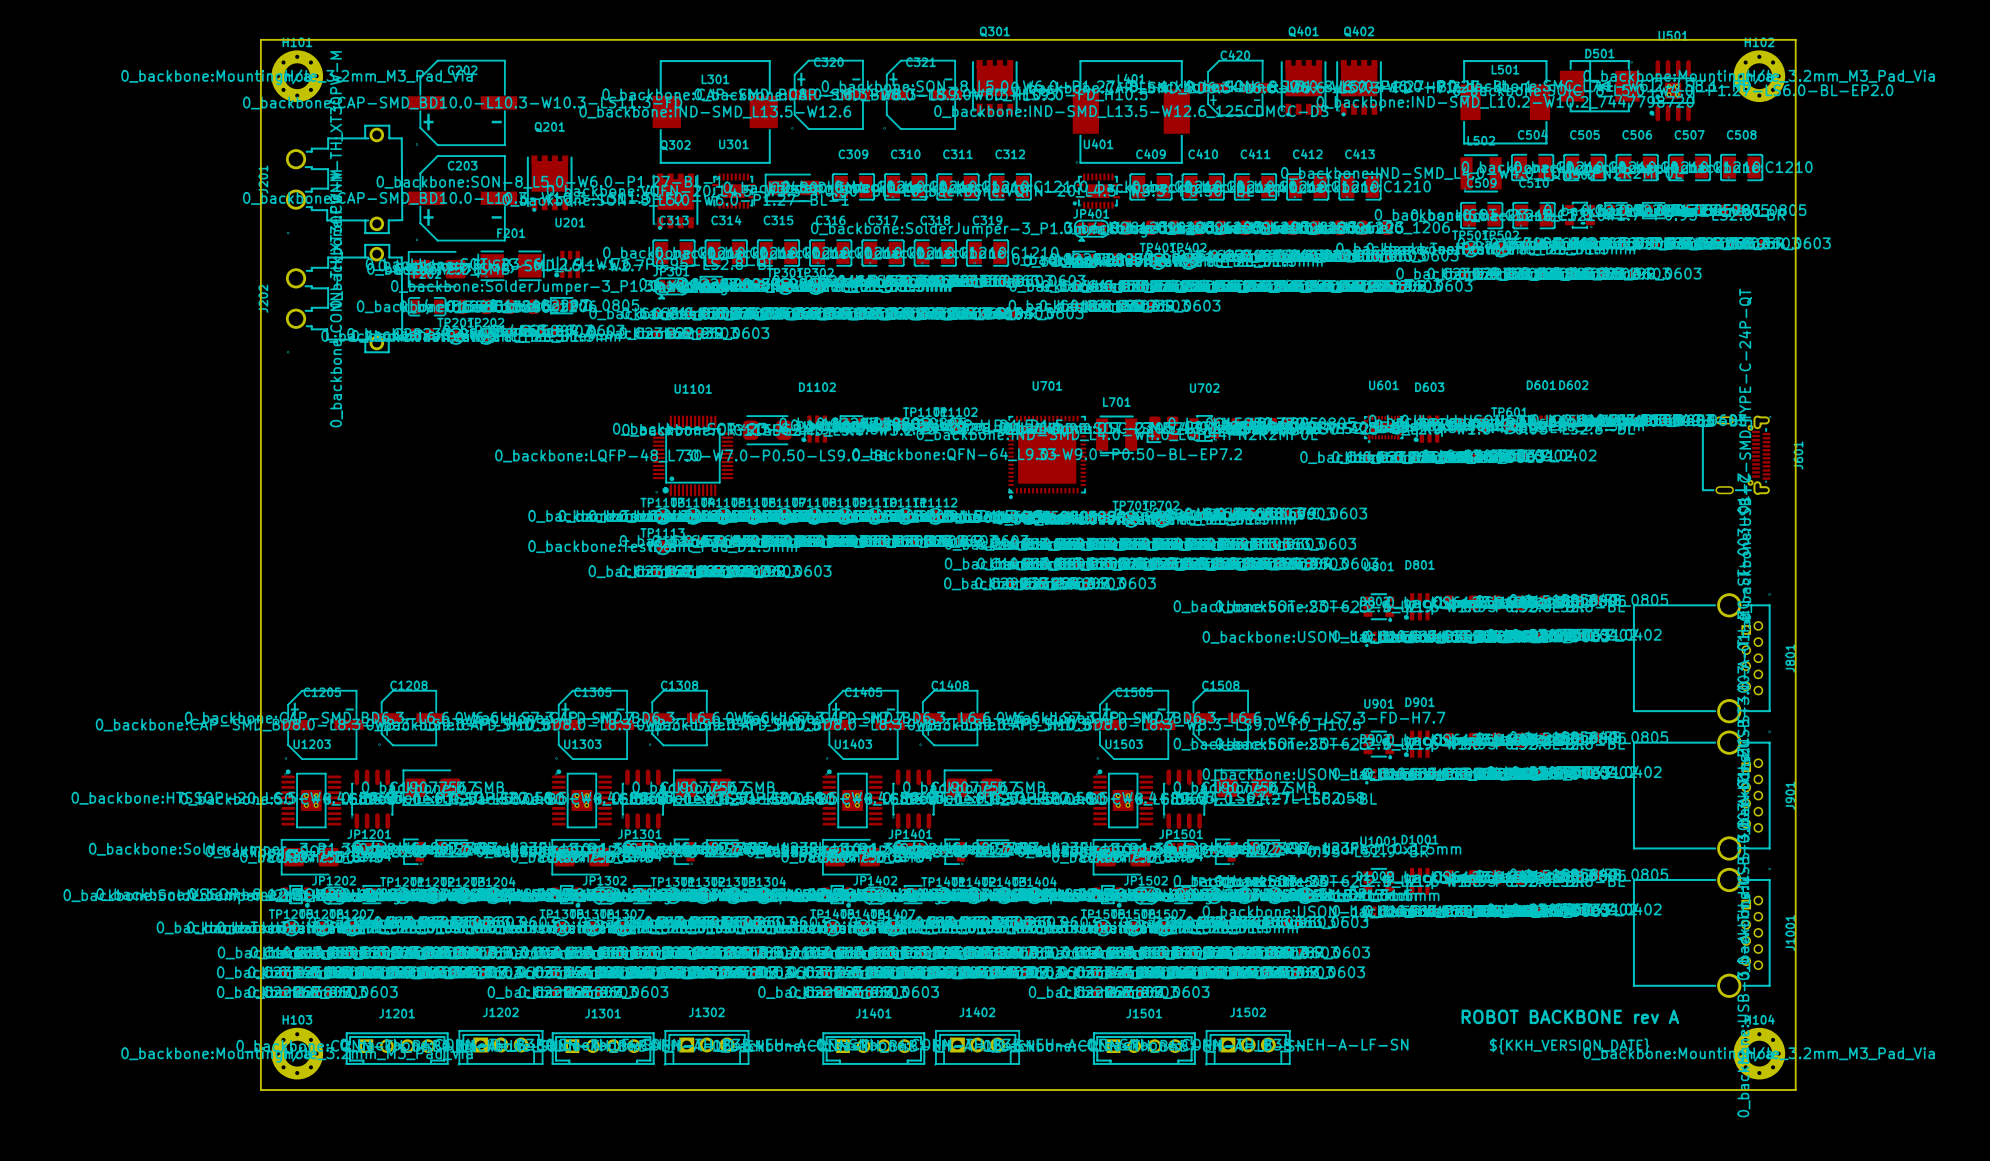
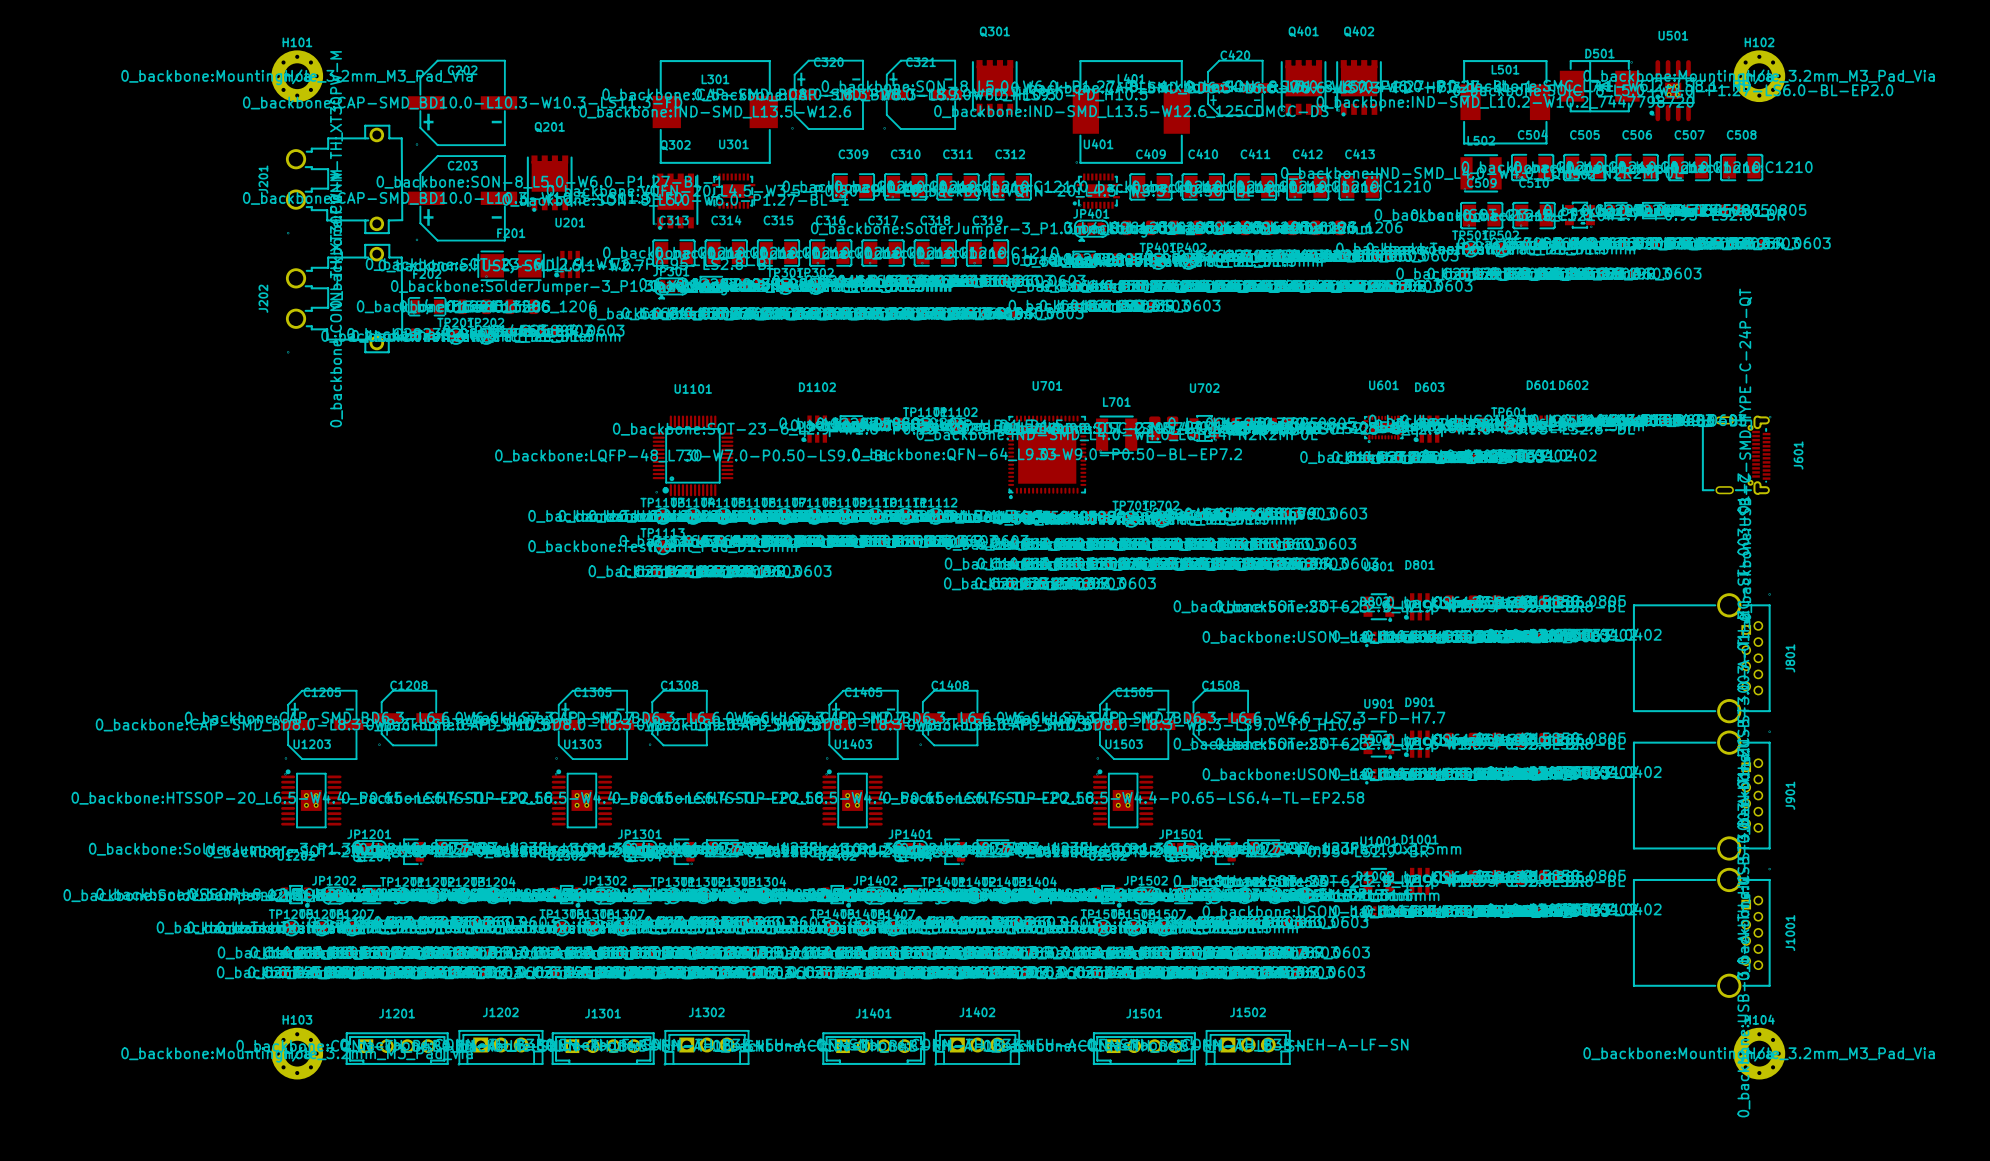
board edge: (260, 39) (1795, 39) (1795, 1090) (260, 1090) (260, 39) -> none
part: (792, 187) -> none
part: (1375, 227) -> none
part: (436, 269) -> none
part: (563, 305) -> none
part: (663, 333) -> none
part: (694, 333) -> none
part: (767, 430) -> none
part: (1588, 600) -> none
part: (1588, 737) -> none
part: (431, 787) -> none
part: (702, 787) -> none
part: (972, 787) -> none
part: (1243, 787) -> none
part: (372, 799) -> none
part: (642, 799) -> none
part: (913, 799) -> none
part: (1184, 799) -> none
part: (309, 857) -> none
part: (580, 857) -> none
part: (851, 857) -> none
part: (1121, 857) -> none
part: (1588, 874) -> none
part: (291, 992) -> none
part: (322, 992) -> none
part: (562, 992) -> none
part: (593, 992) -> none
part: (833, 992) -> none
part: (864, 992) -> none
part: (1103, 992) -> none
part: (1134, 992) -> none
text: ROBOT BACKBONE rev A (1570, 1016) -> none
text: ${KKH_VERSION_DATE} (1569, 1046) -> none

